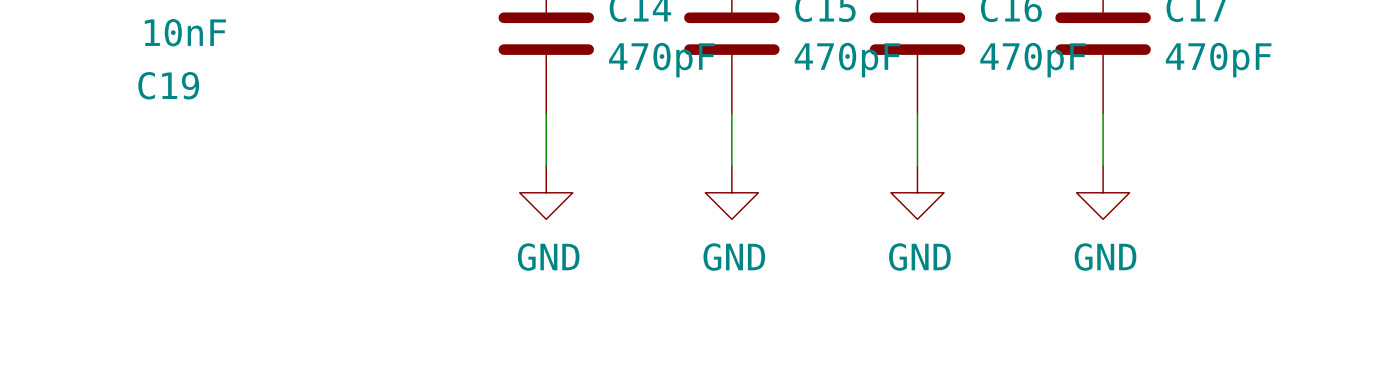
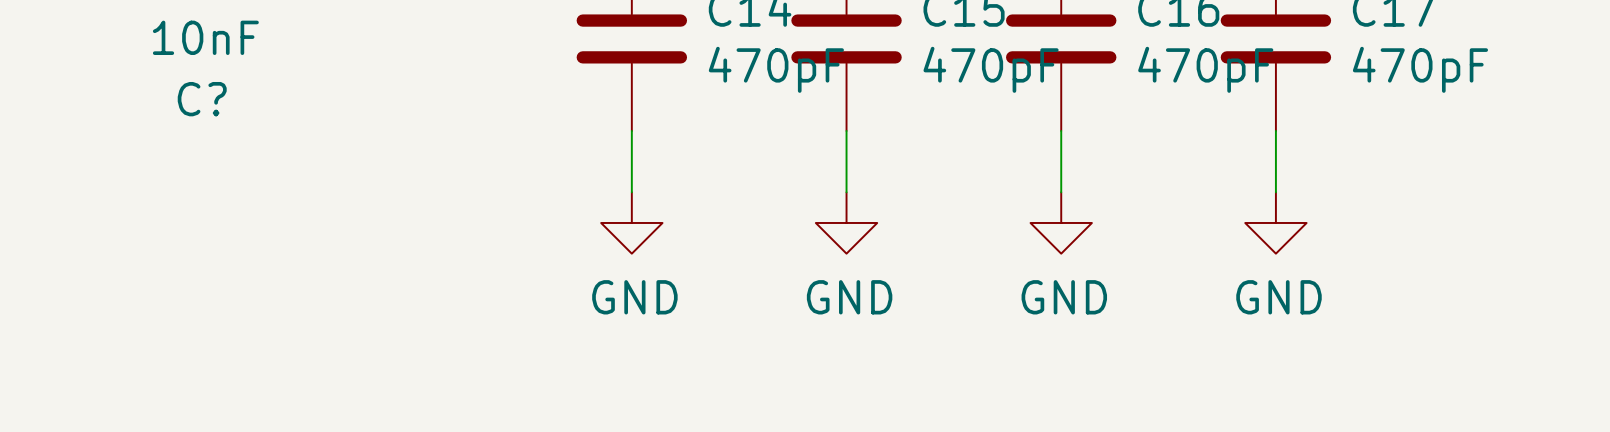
C19 name: C19 (168, 85) -> C? (202, 99)

